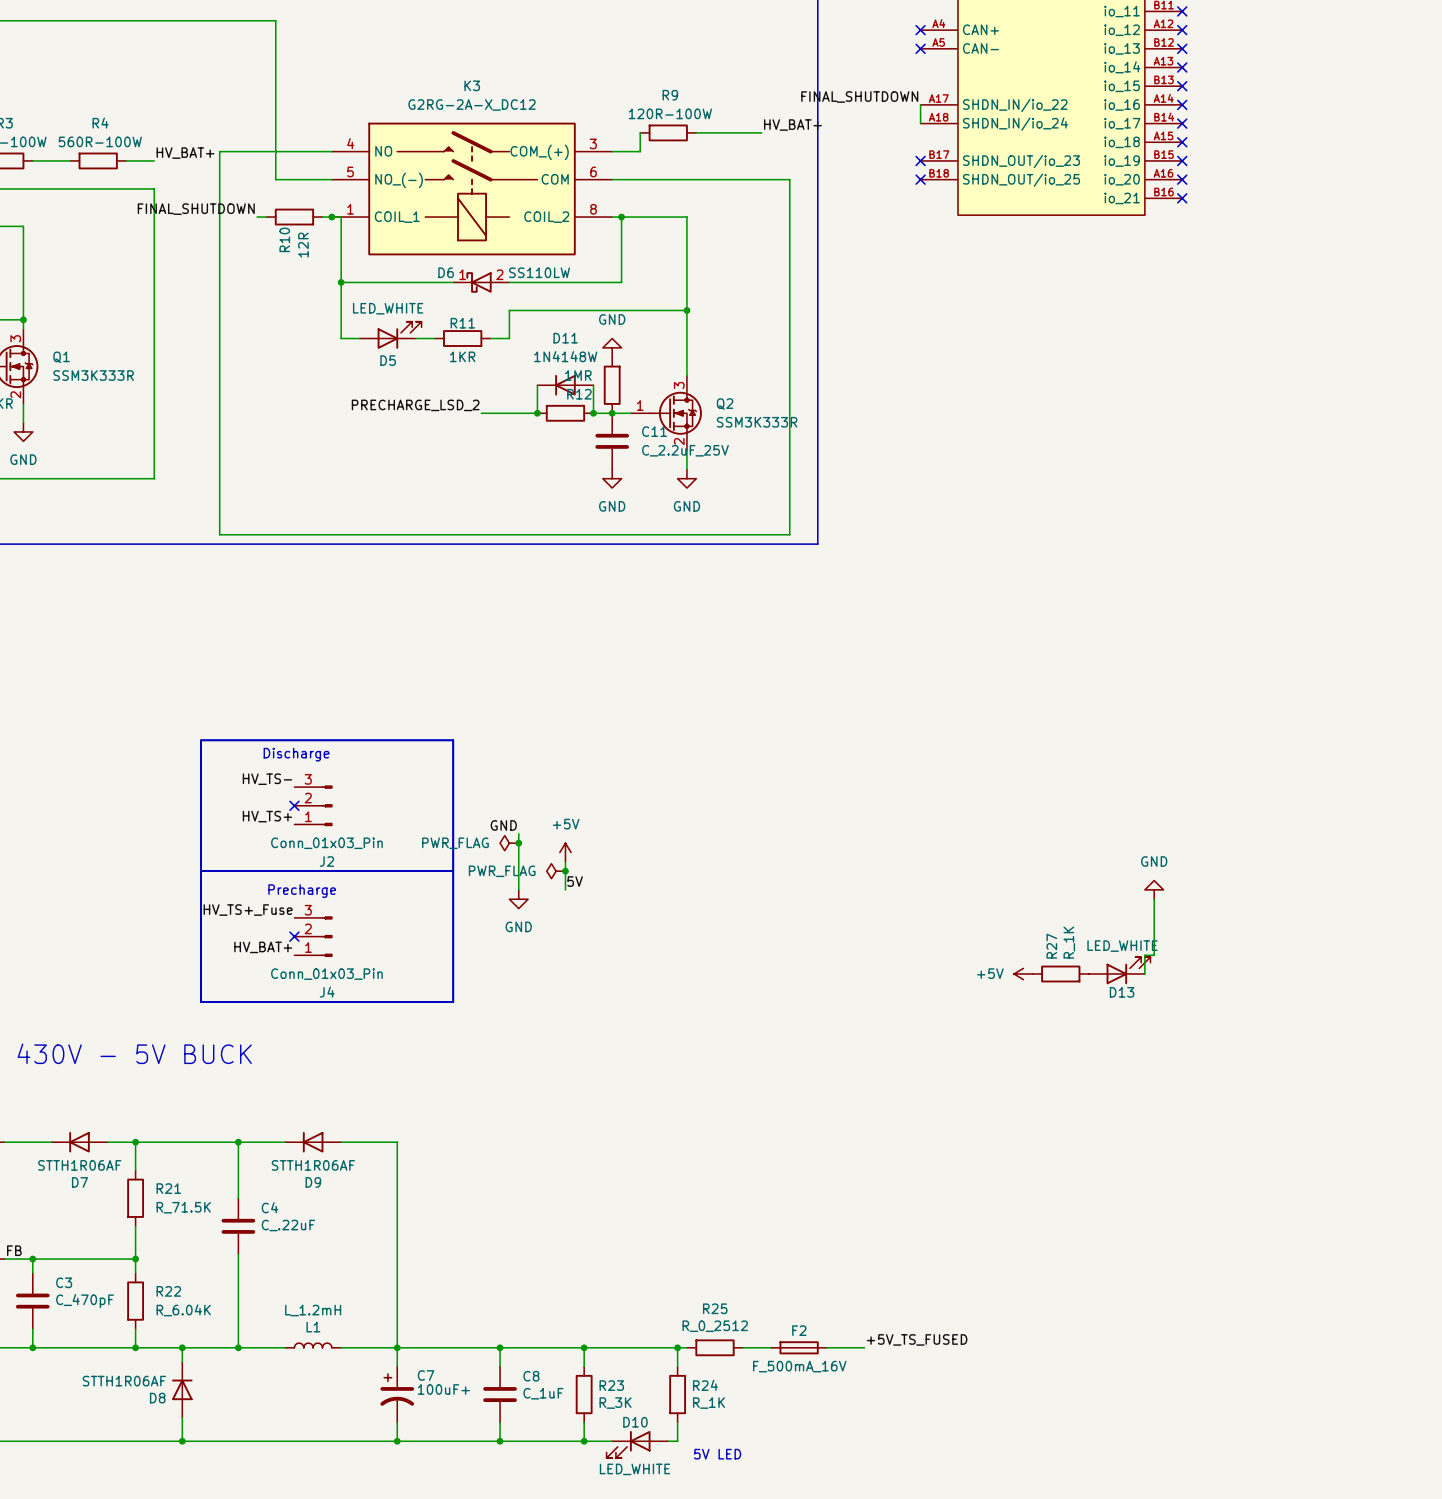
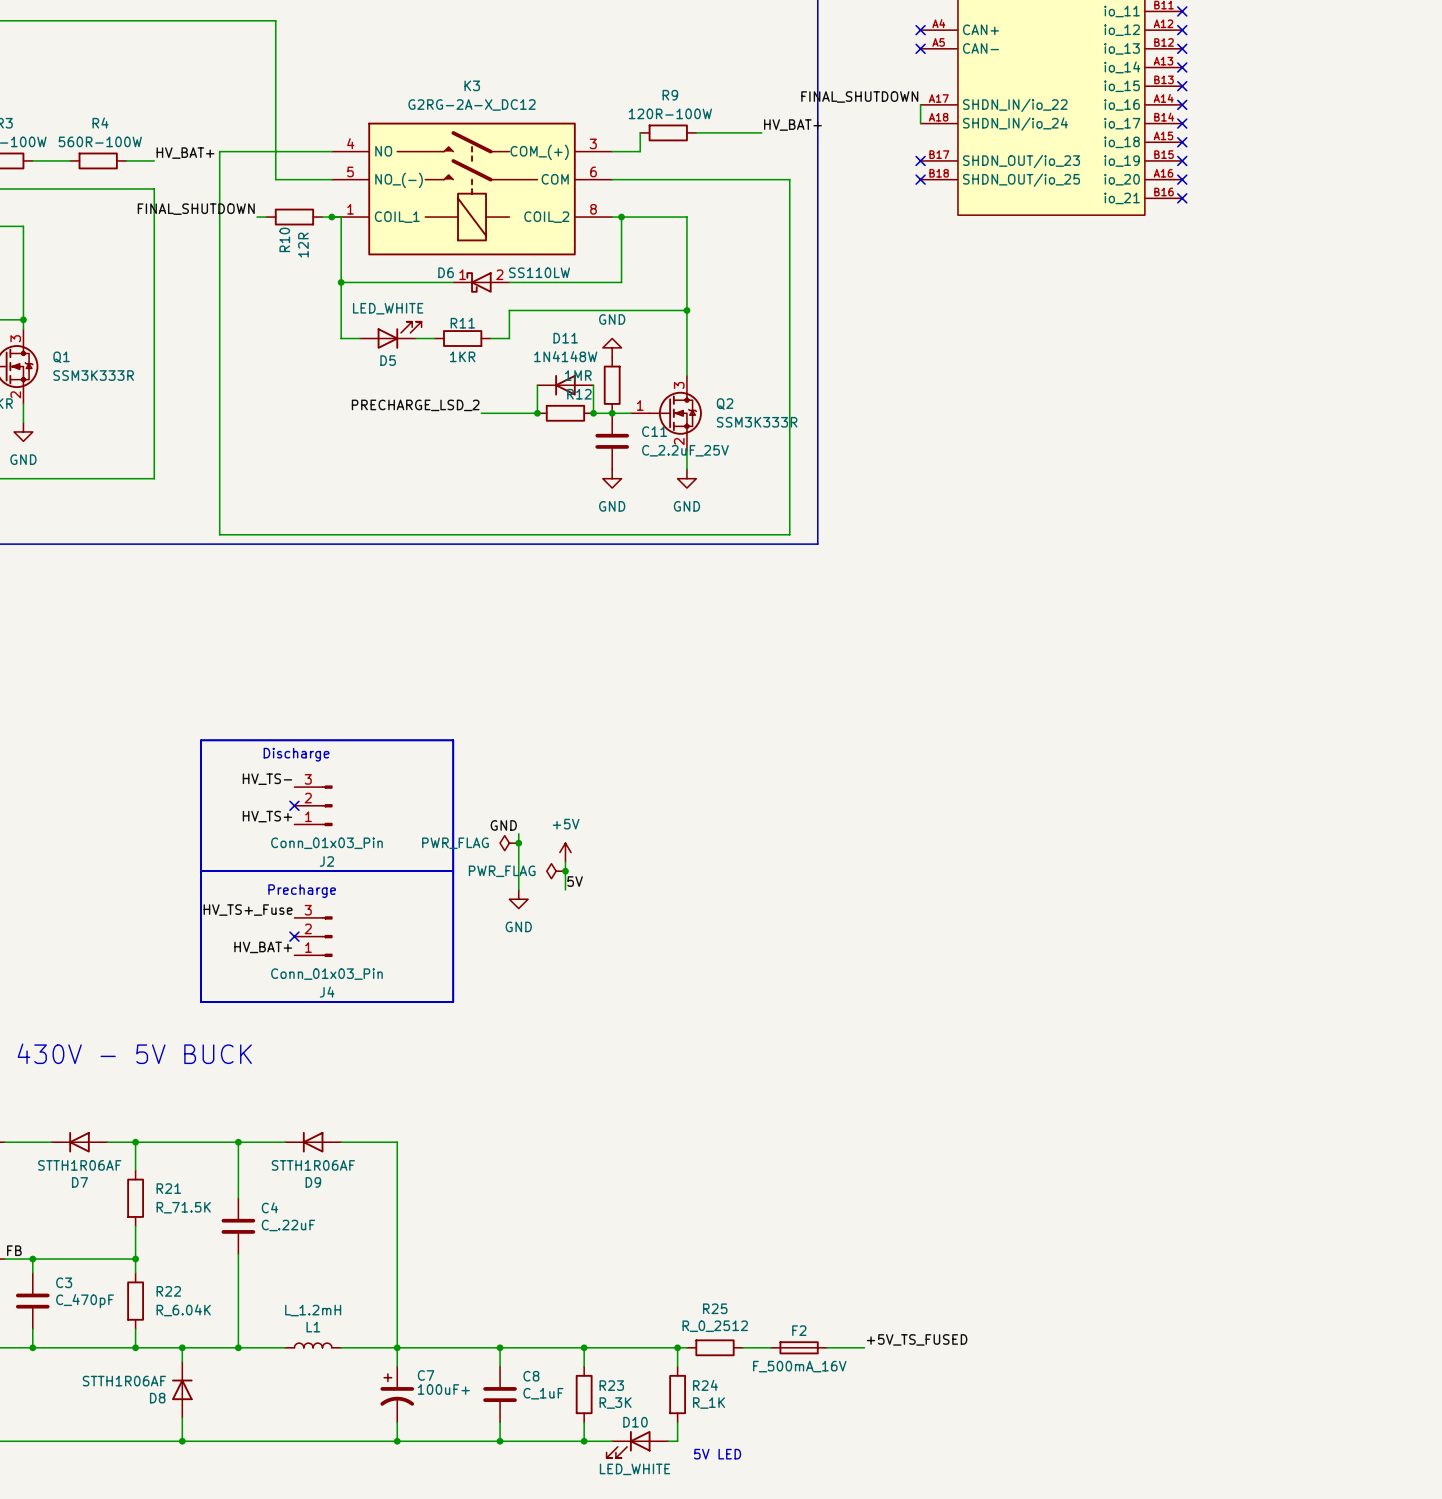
power symbol: GND (1154, 889) -> none
wire: (1154, 899) (1154, 955) (1144, 955) (1144, 974) -> none
D13: LED_WHITE (1119, 970) -> none
power symbol: +5V (1023, 974) -> none
R27: R_1K (1060, 974) -> none

